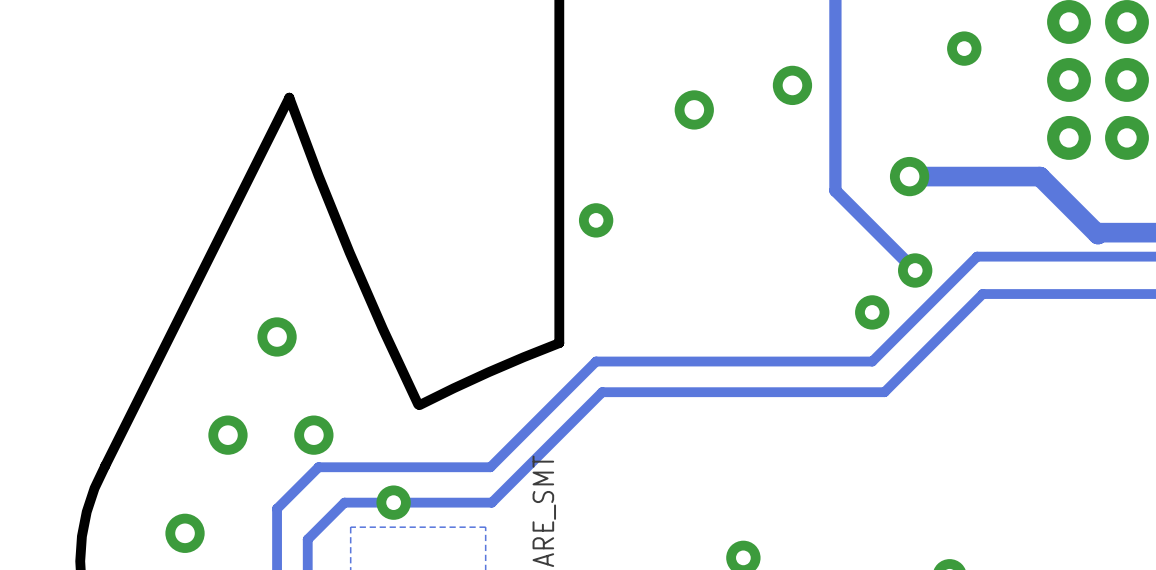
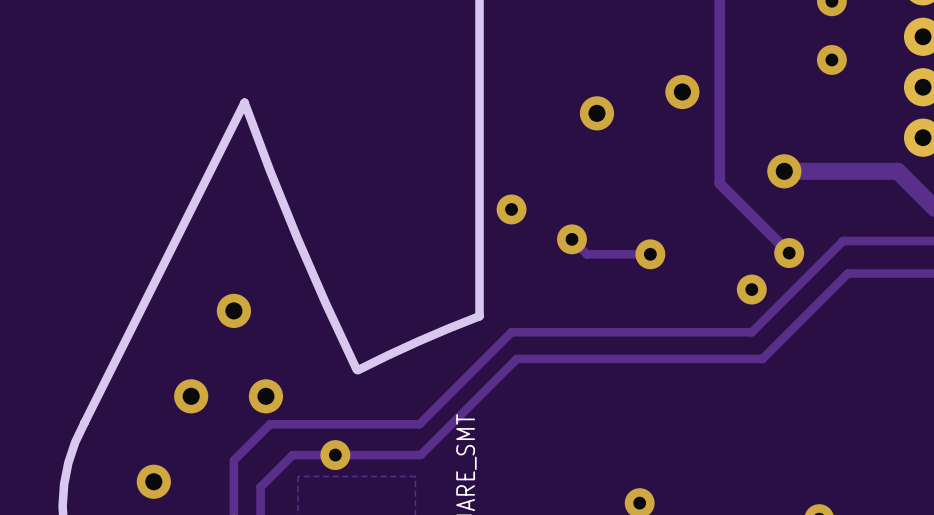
track: none -> (571, 239) (586, 254) (650, 254)
via: none -> (571, 239)
via: none -> (650, 254)

